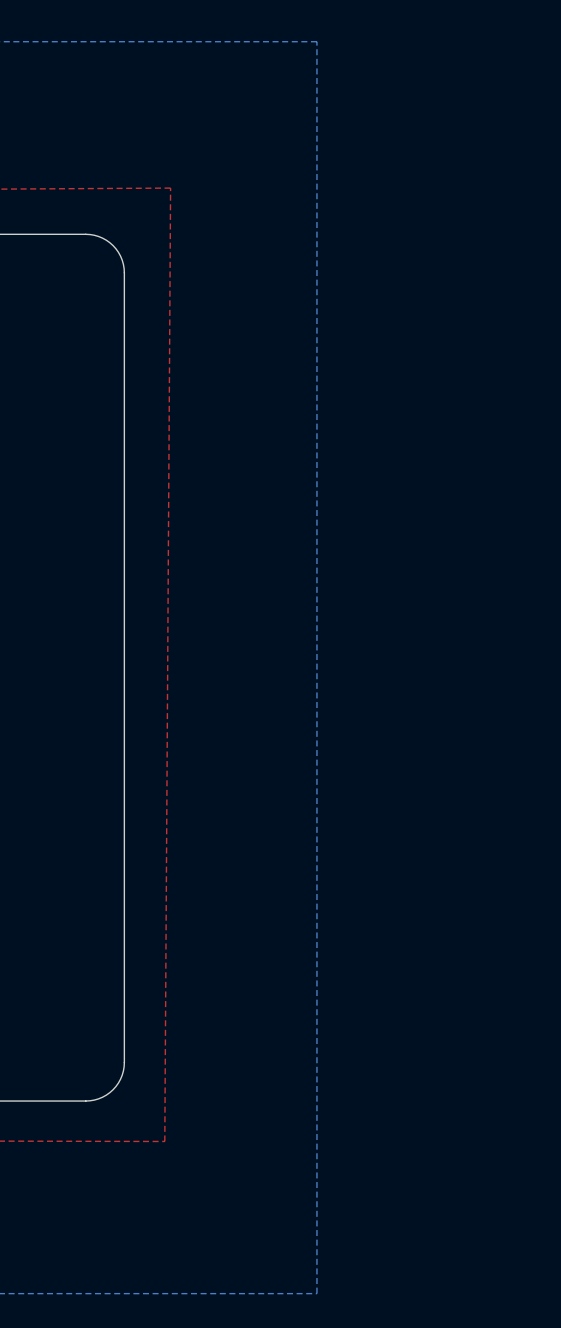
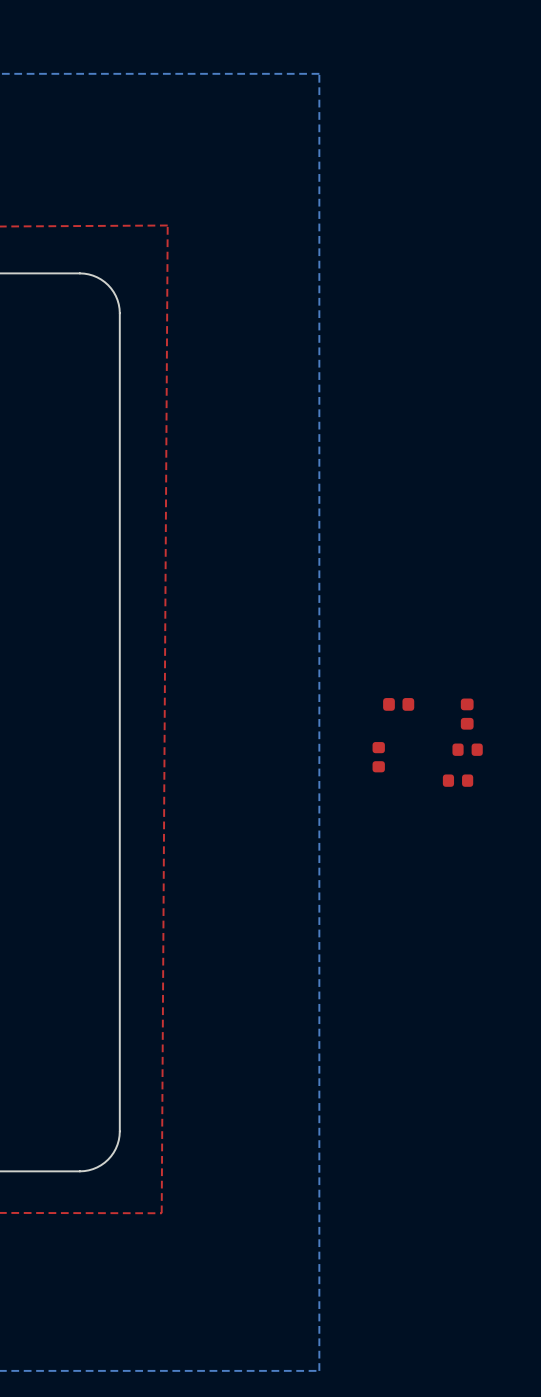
part: none -> (398, 704)
part: none -> (467, 714)
part: none -> (467, 749)
part: none -> (378, 757)
part: none -> (458, 780)

